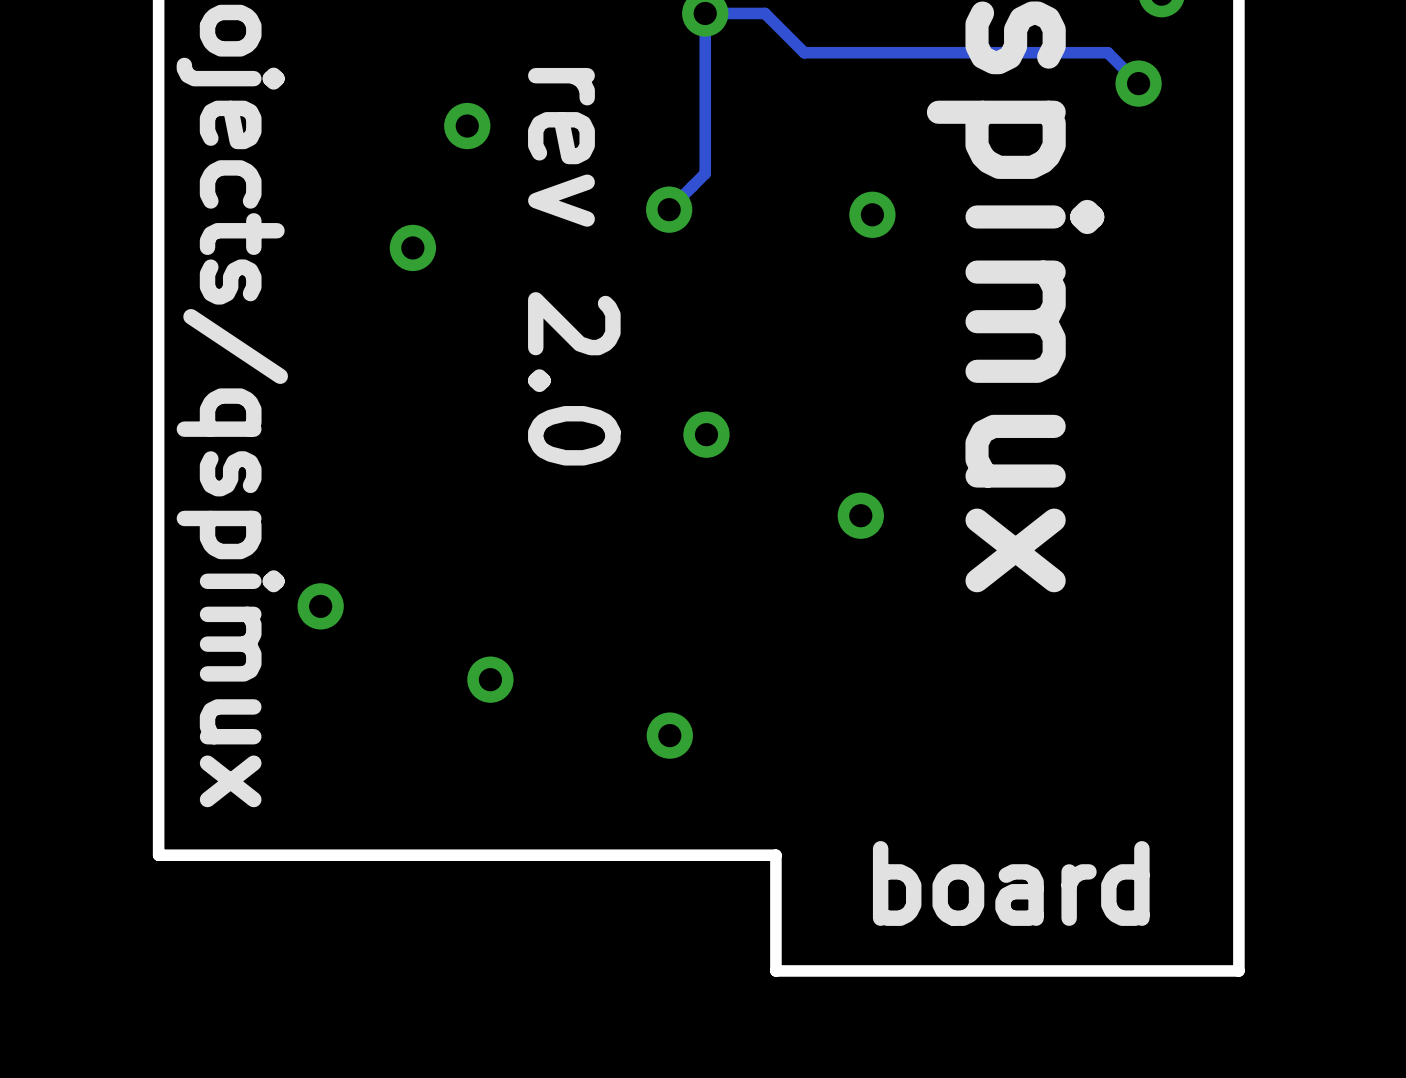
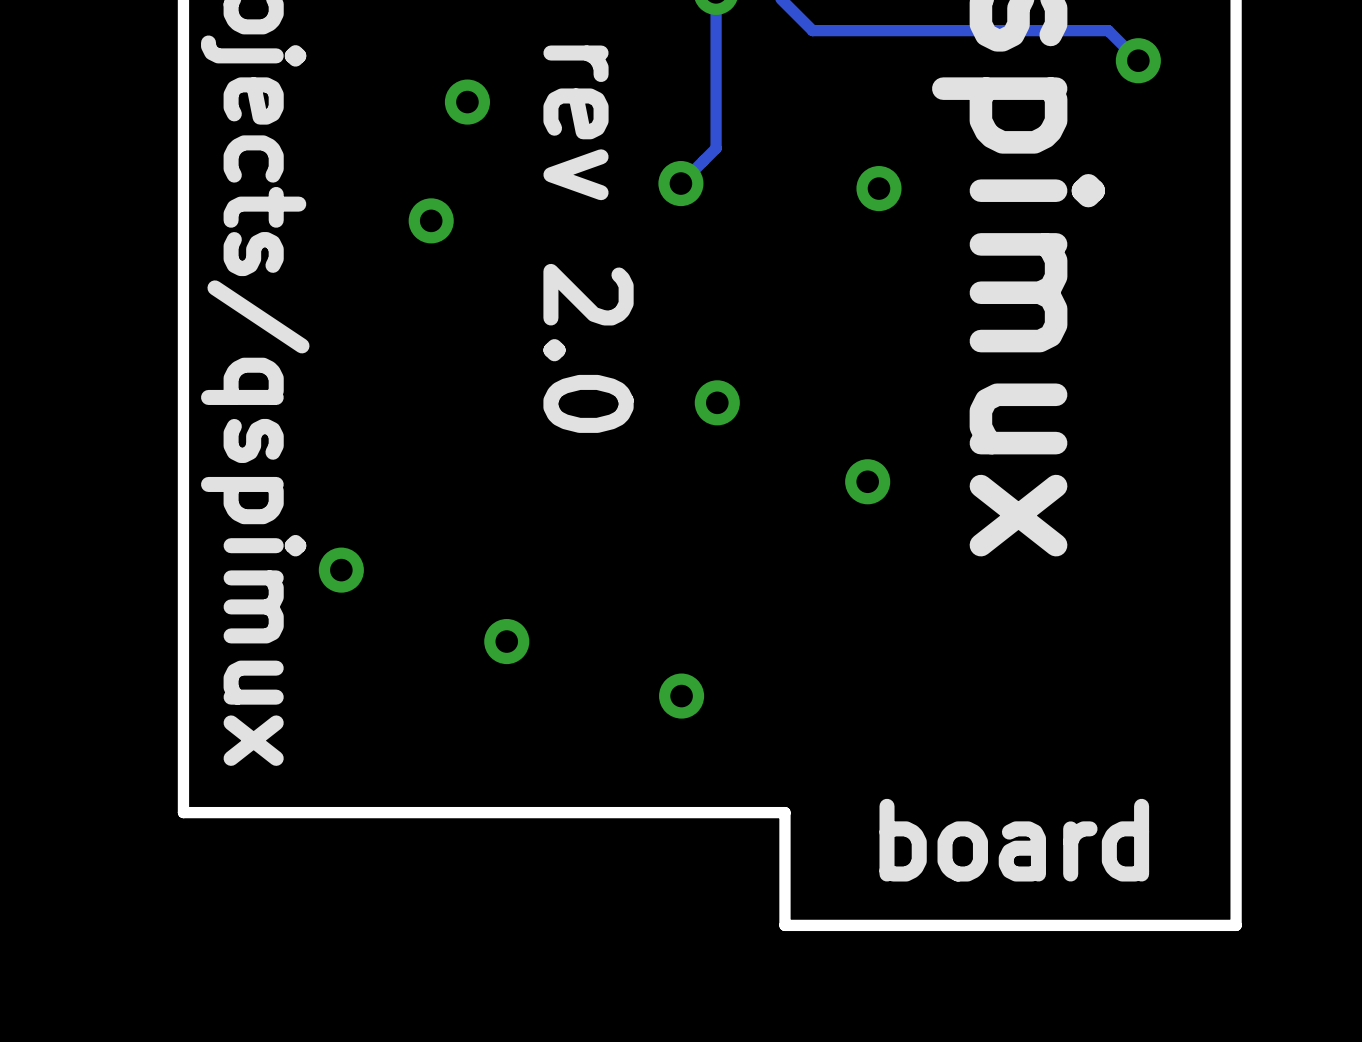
via position: (467, 126) -> (467, 102)

